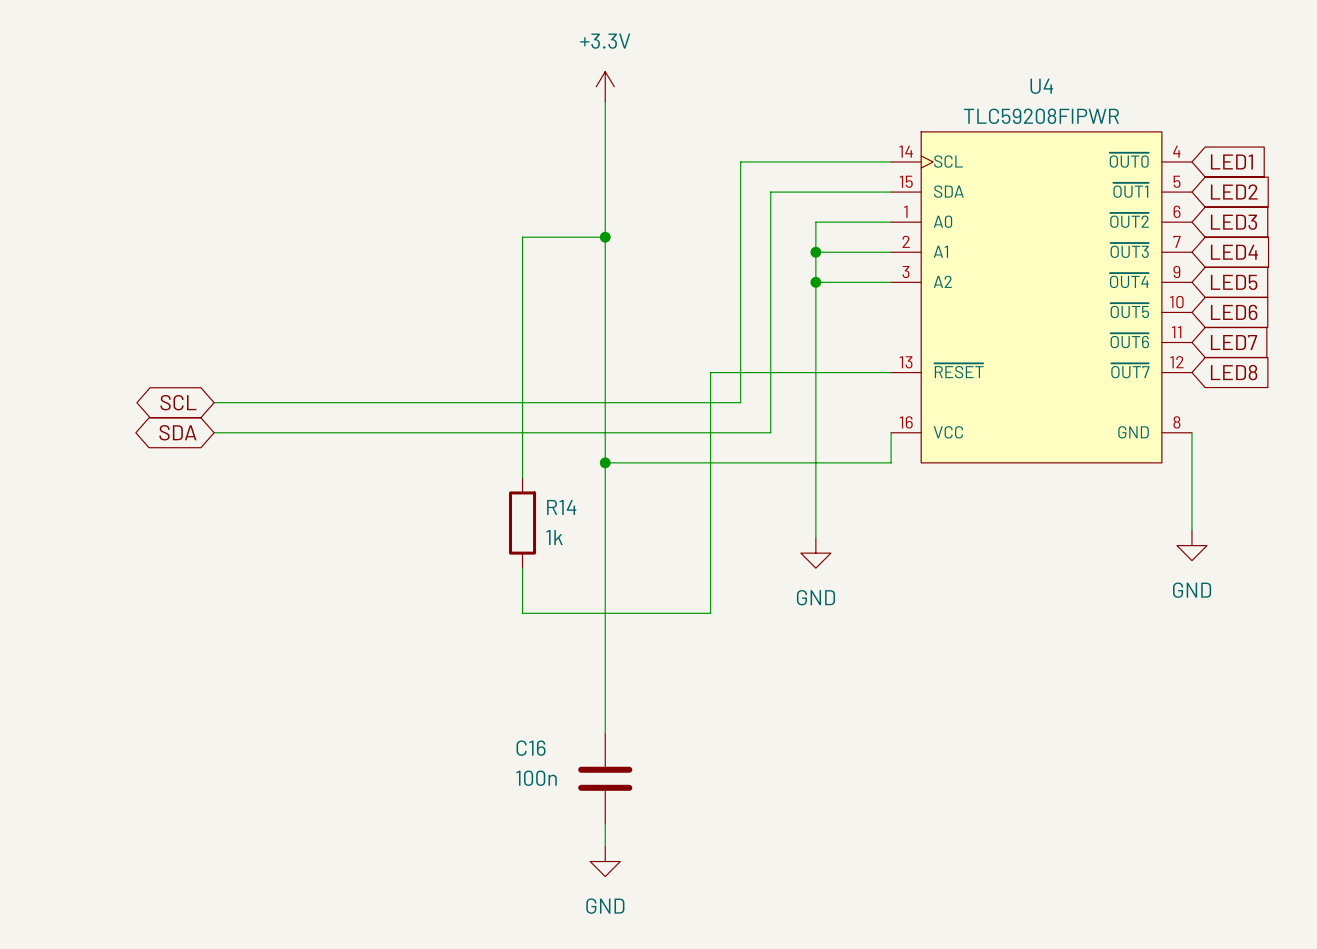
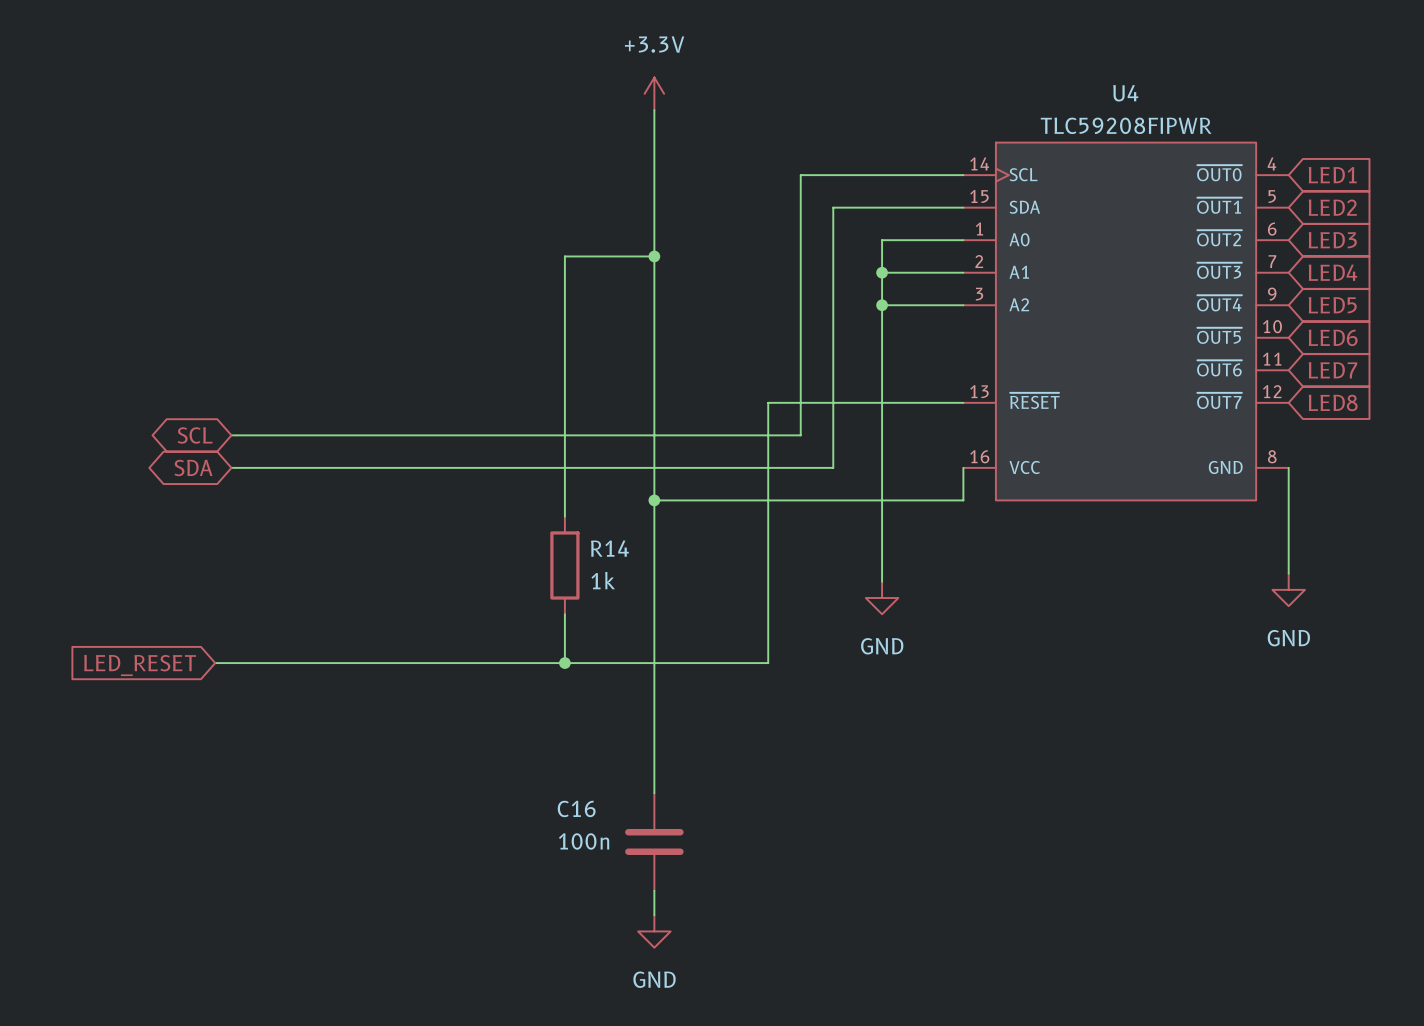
global label: none -> LED_RESET (140, 665)
wire: none -> (215, 663) (564, 663)
junction: none -> (564, 663)

